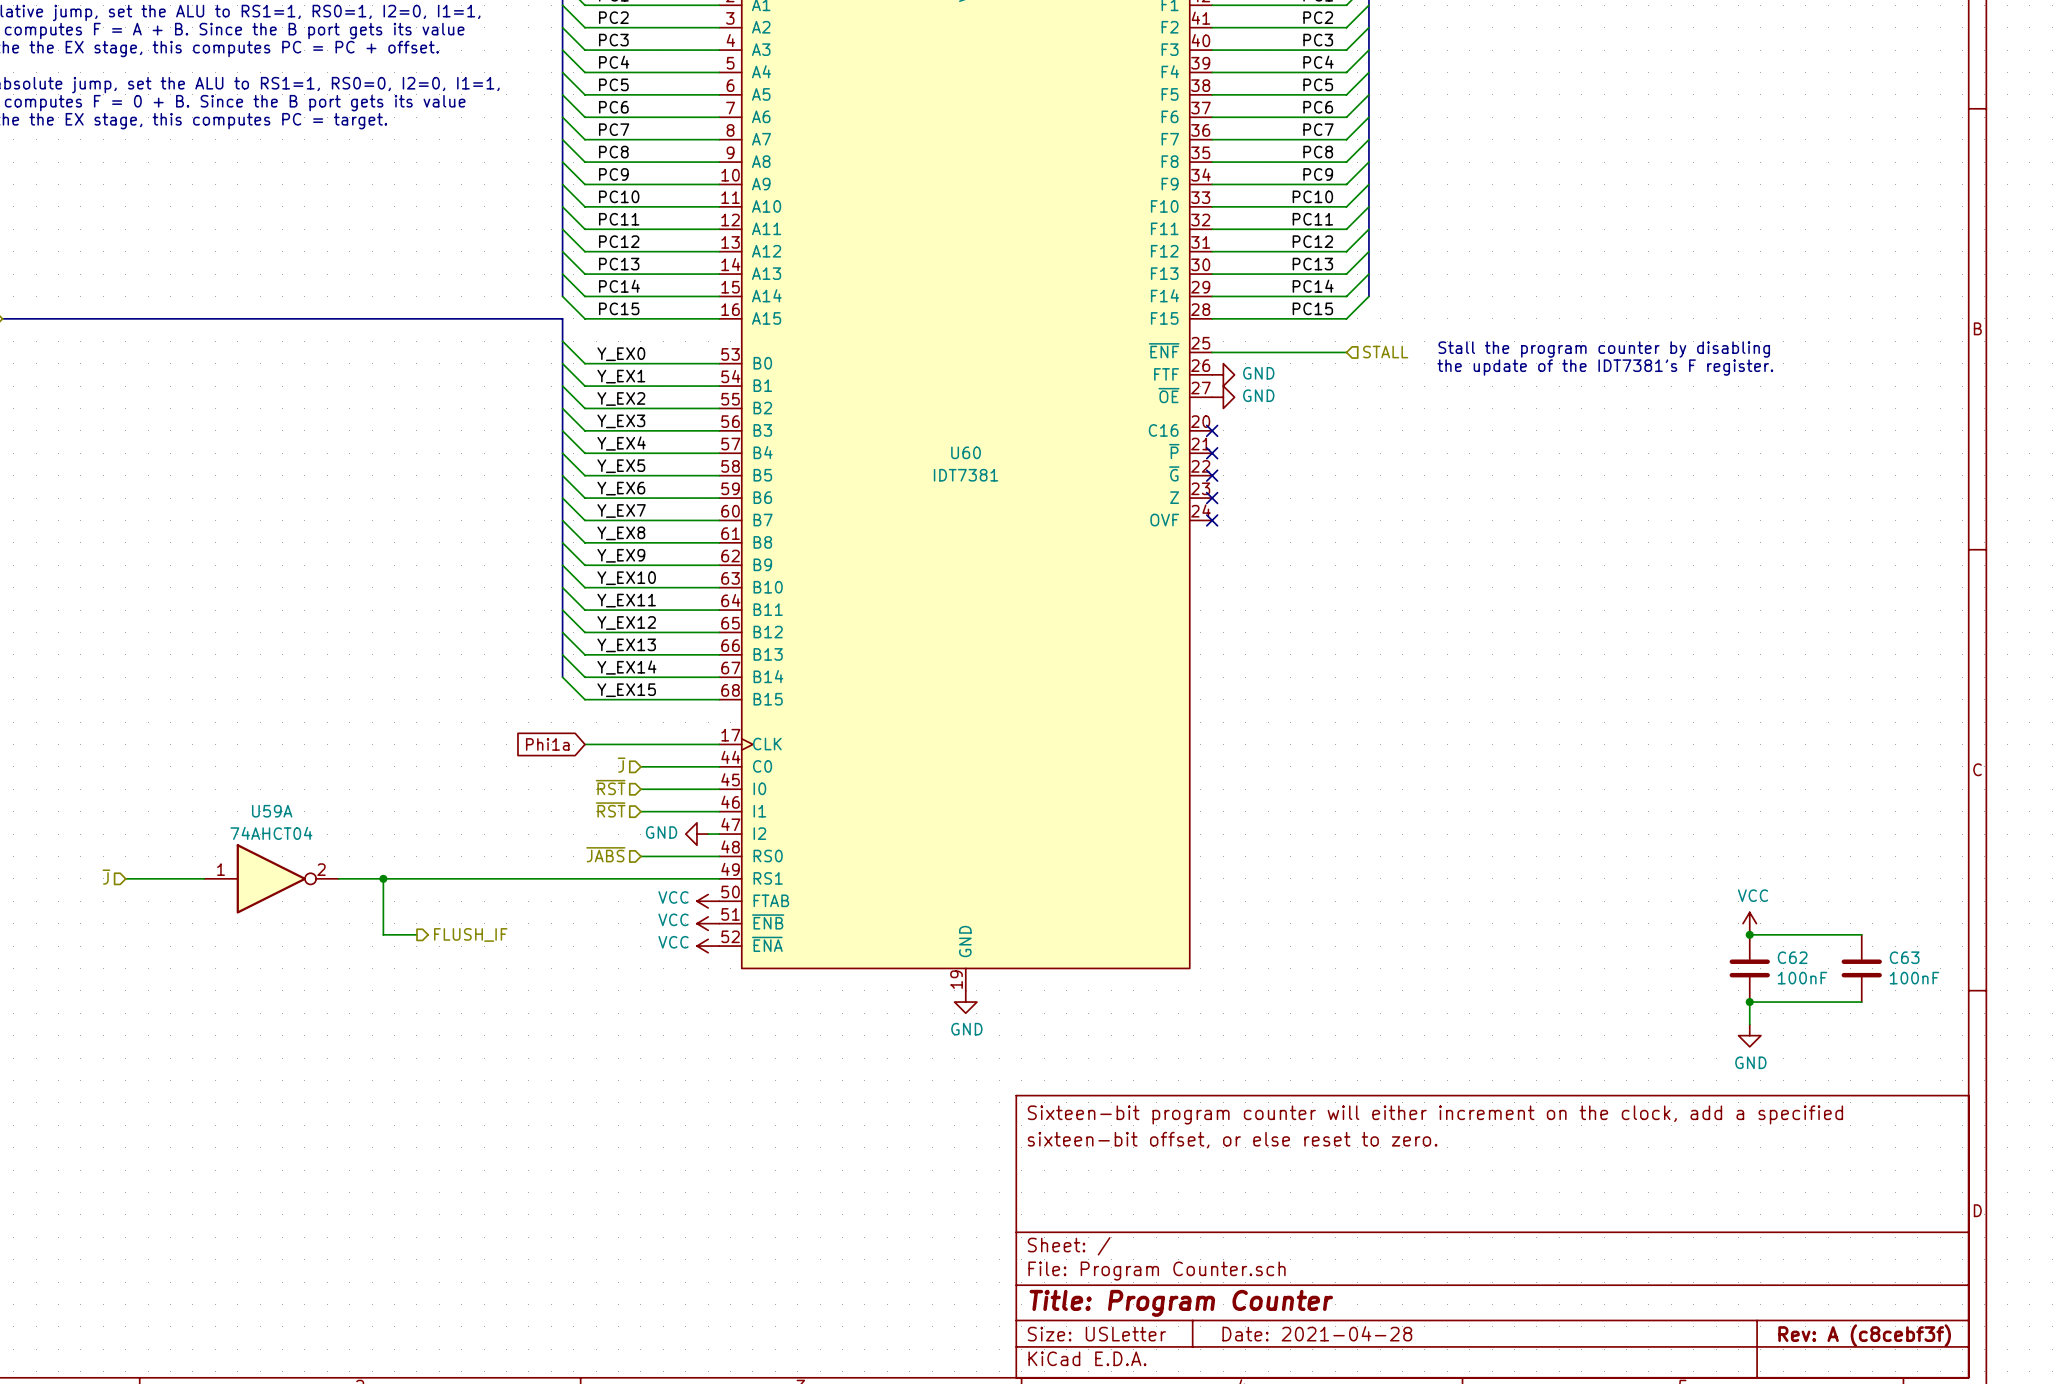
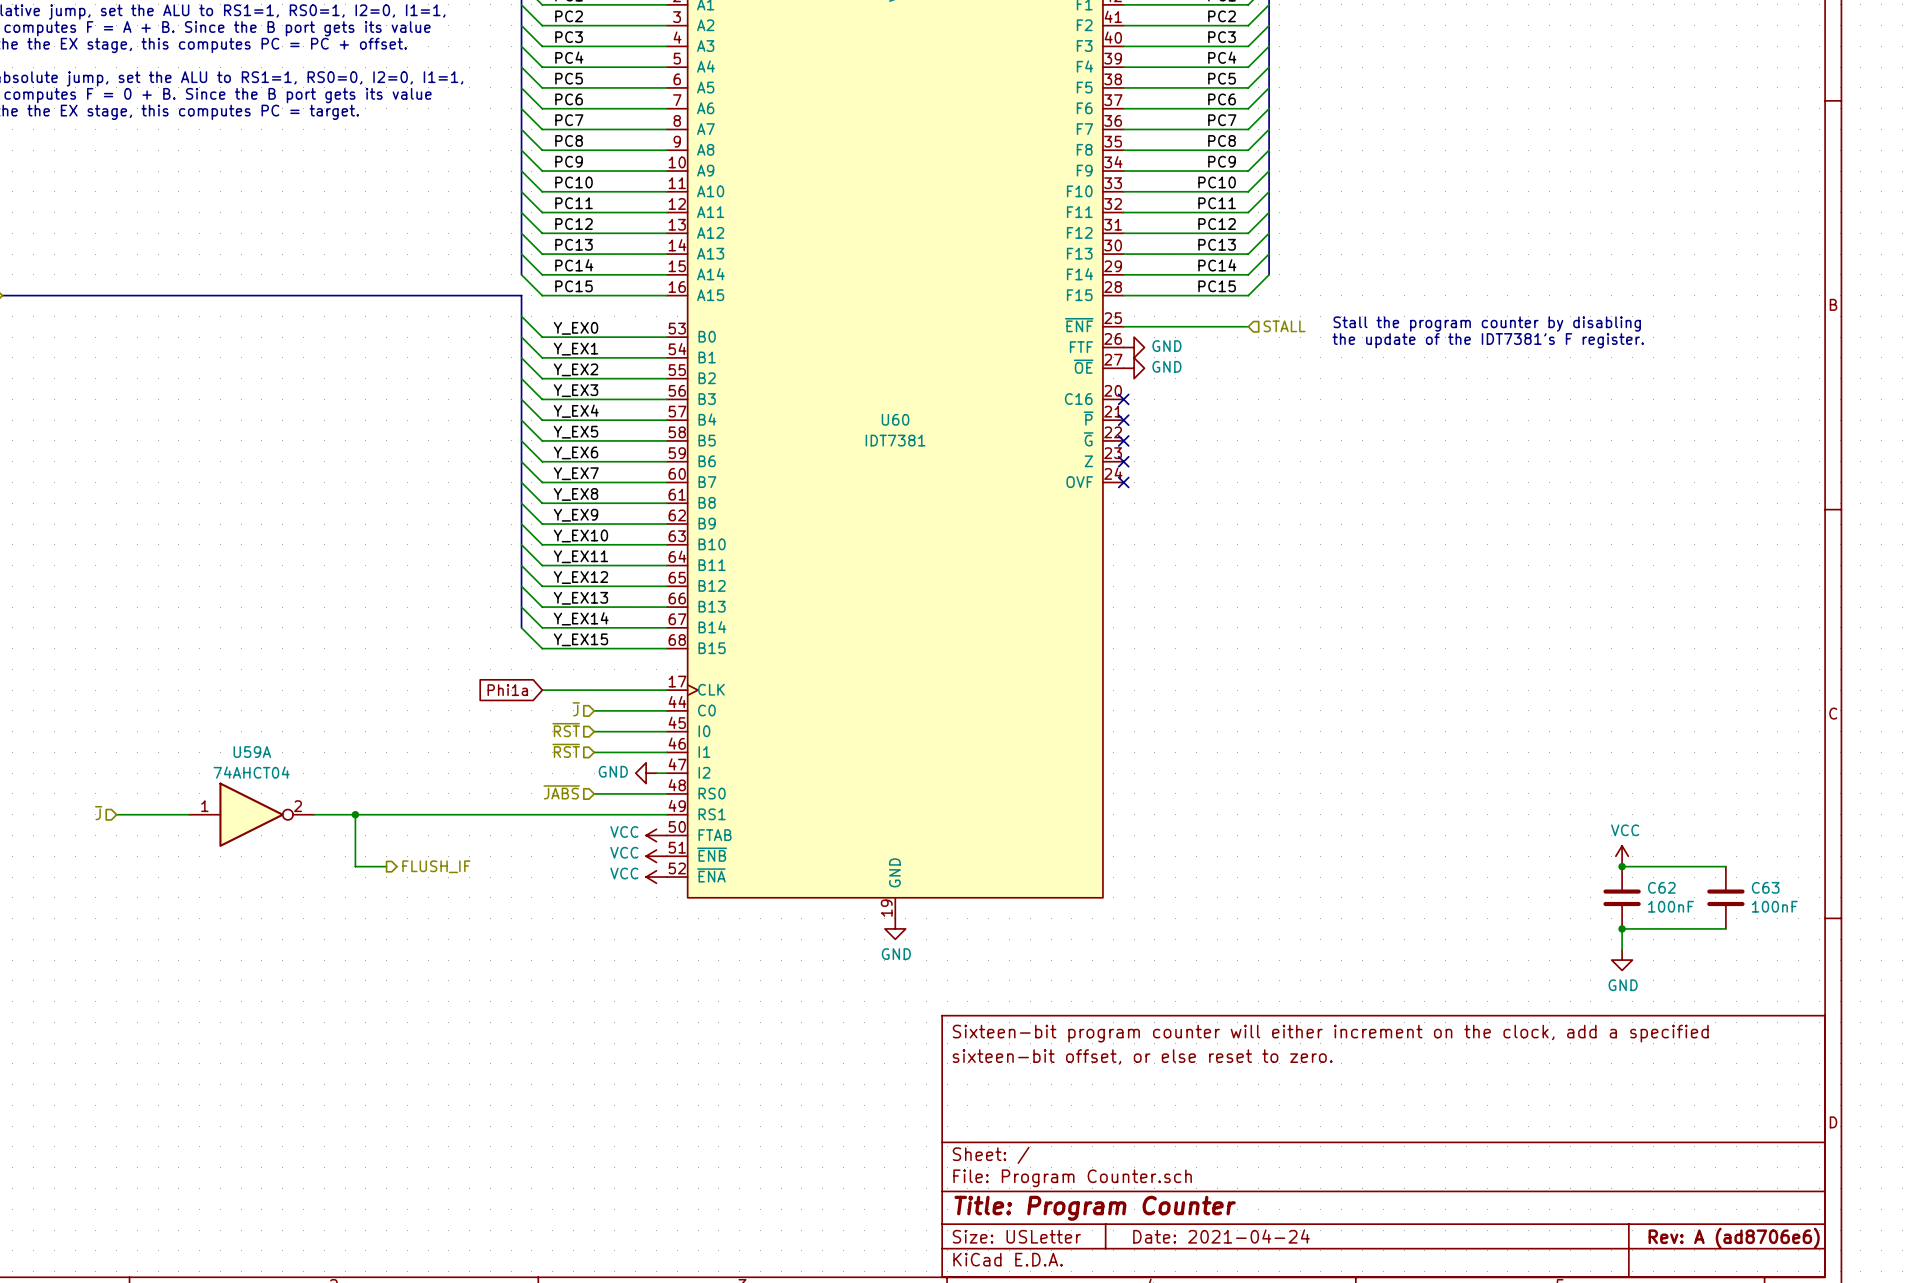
title block: Date: 2021-04-28 (1317, 1333) -> Date: 2021-04-24 (1221, 1236)
title block: Rev: A (c8cebf3f) (1864, 1335) -> Rev: A (ad8706e6) (1734, 1238)

